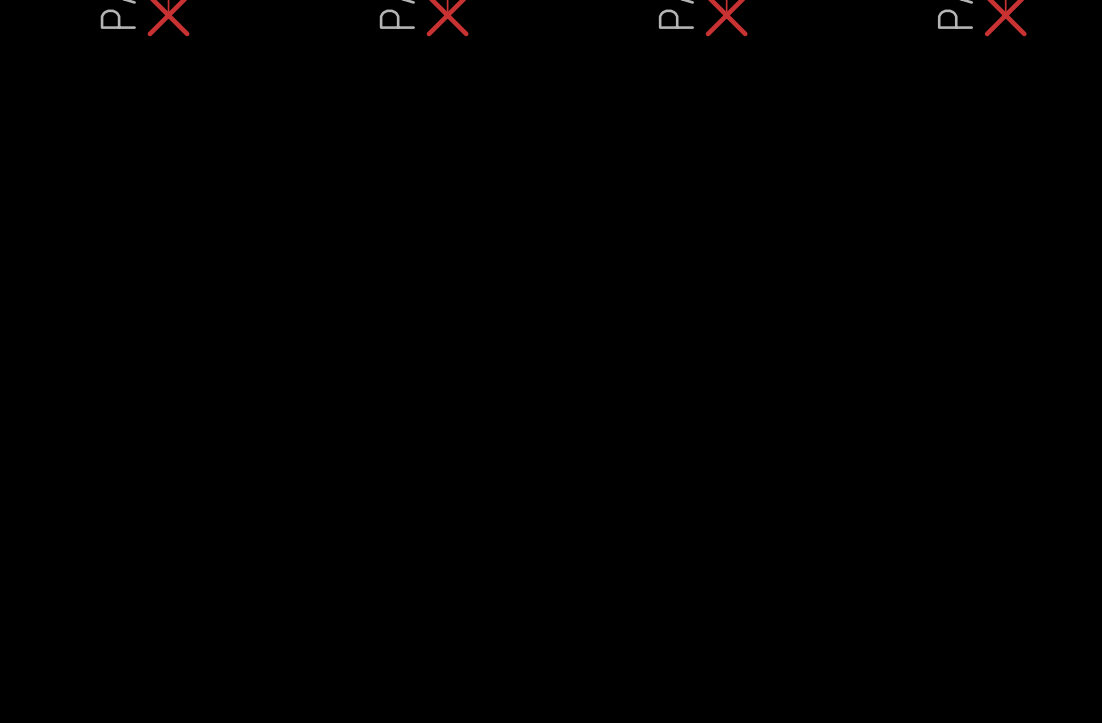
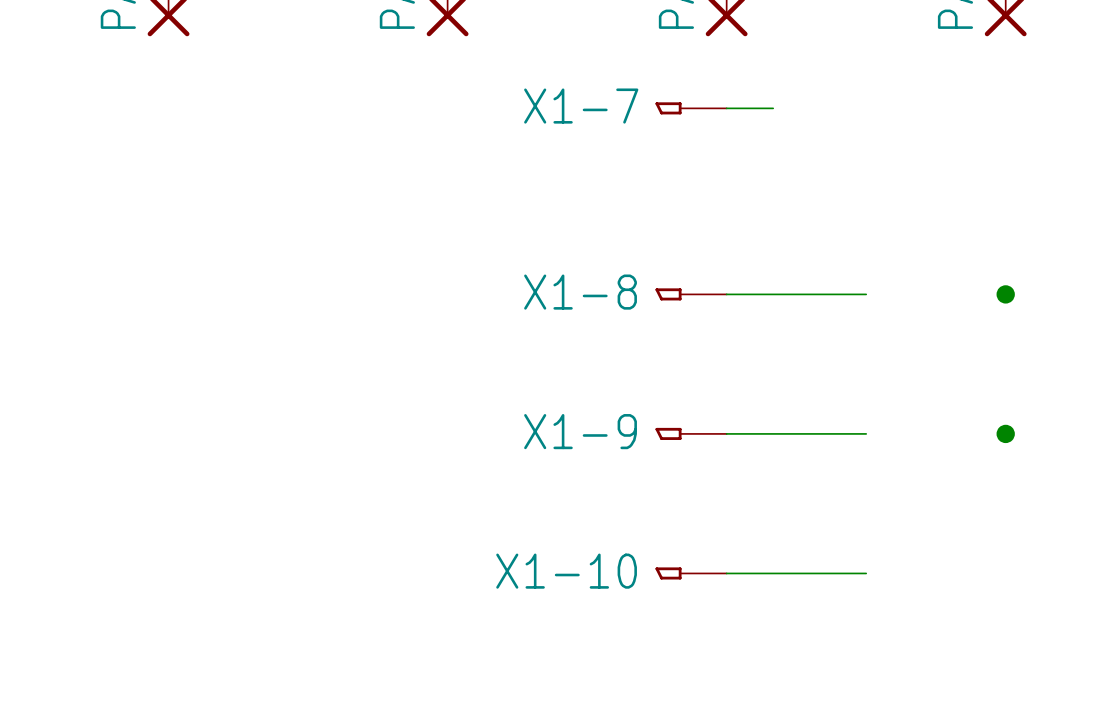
X1-7: none -> (691, 108)
wire: none -> (726, 108) (773, 108)
X1-8: none -> (691, 294)
wire: none -> (726, 294) (866, 294)
junction: none -> (1005, 294)
X1-9: none -> (691, 433)
wire: none -> (726, 433) (866, 433)
junction: none -> (1005, 433)
X1-10: none -> (691, 573)
wire: none -> (726, 573) (866, 573)

